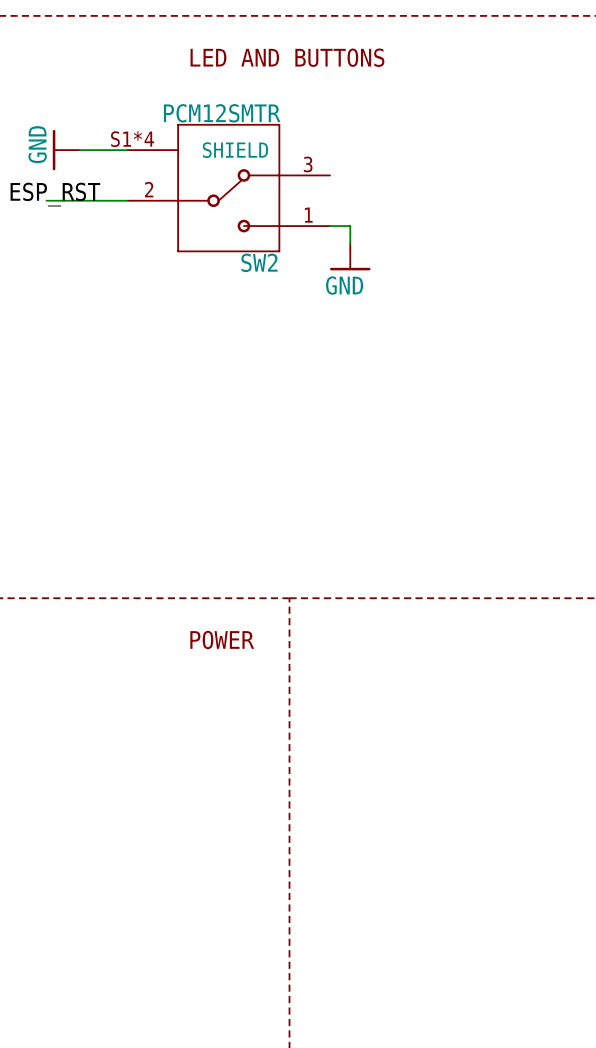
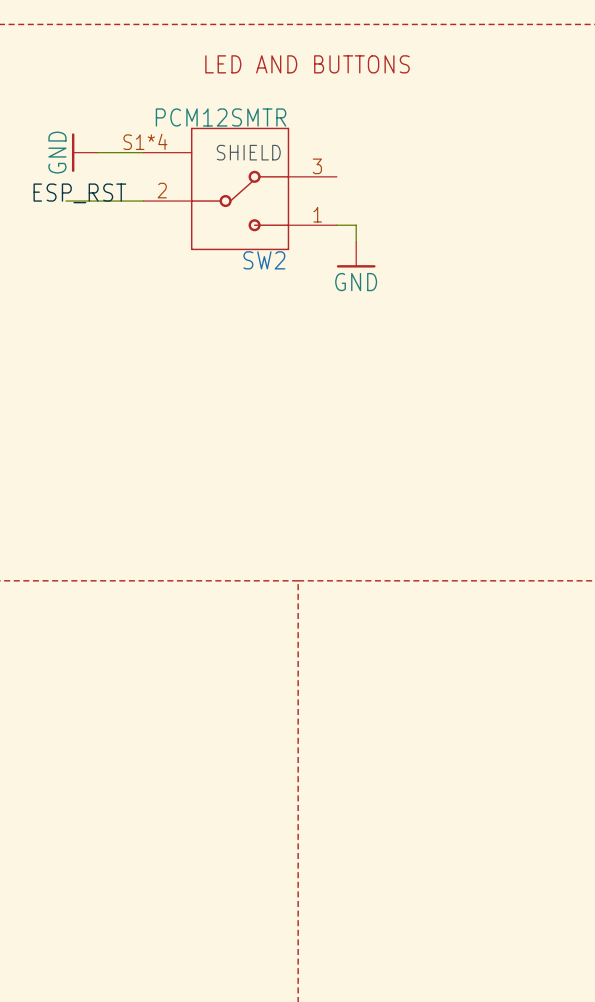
text: POWER (222, 640) -> none

